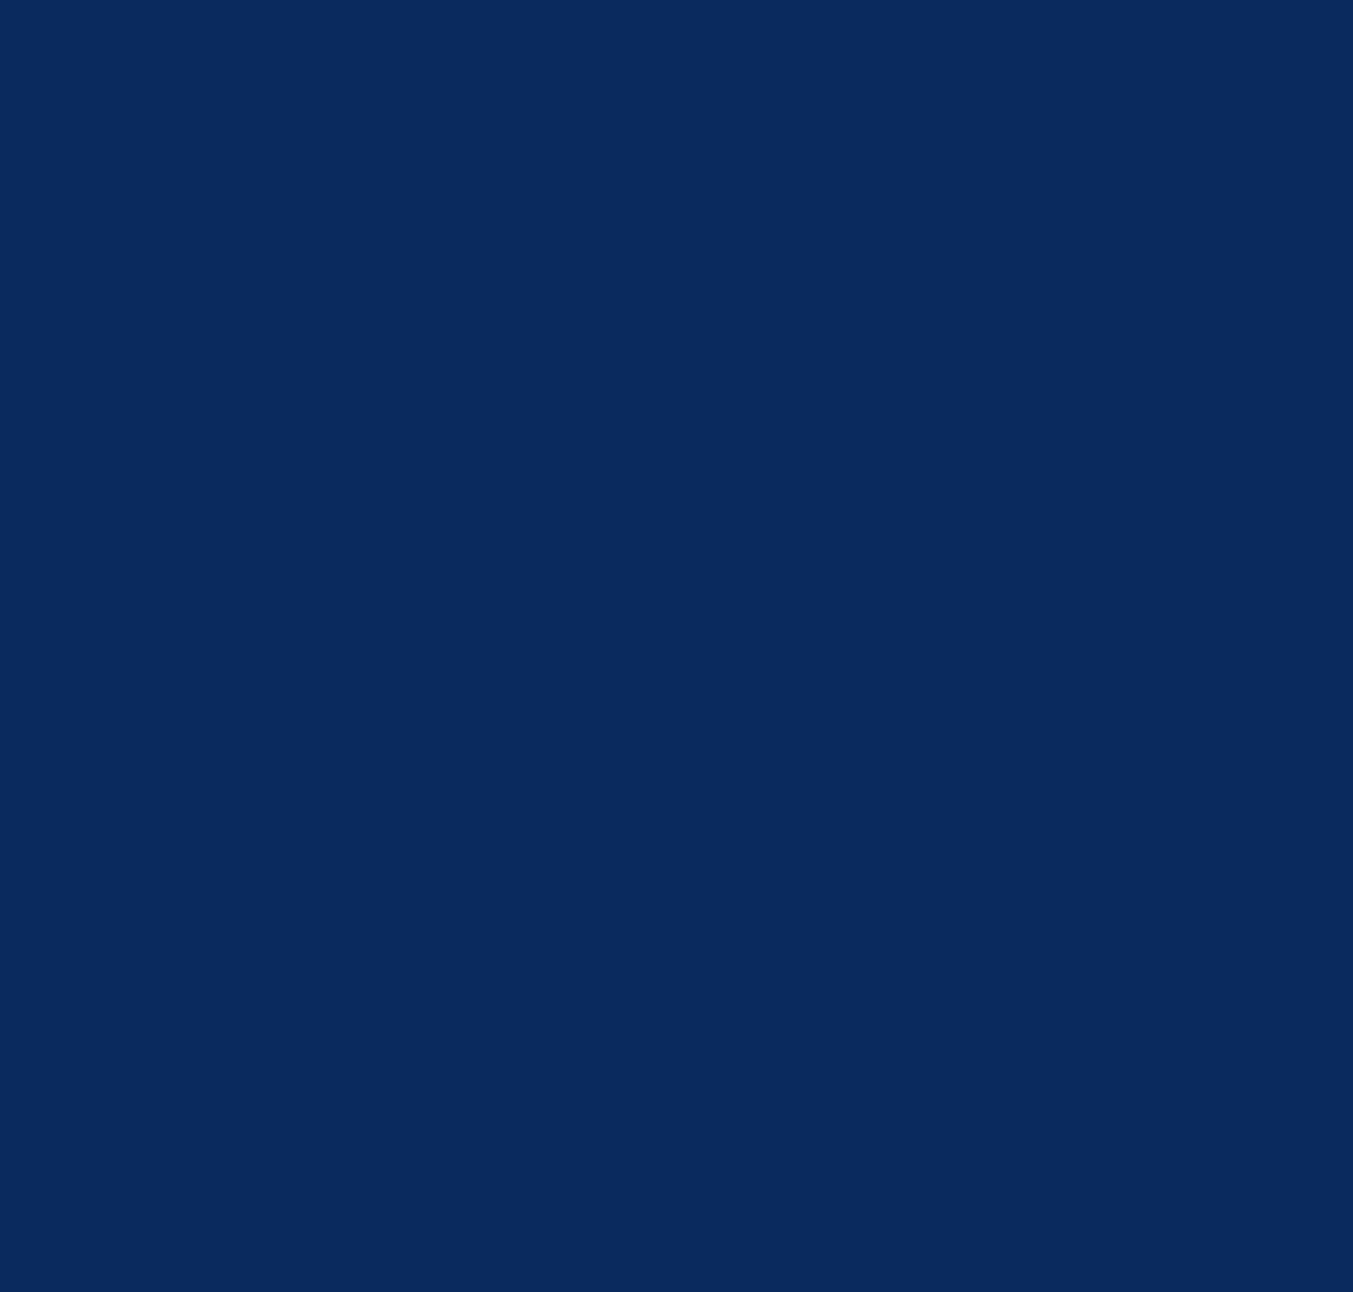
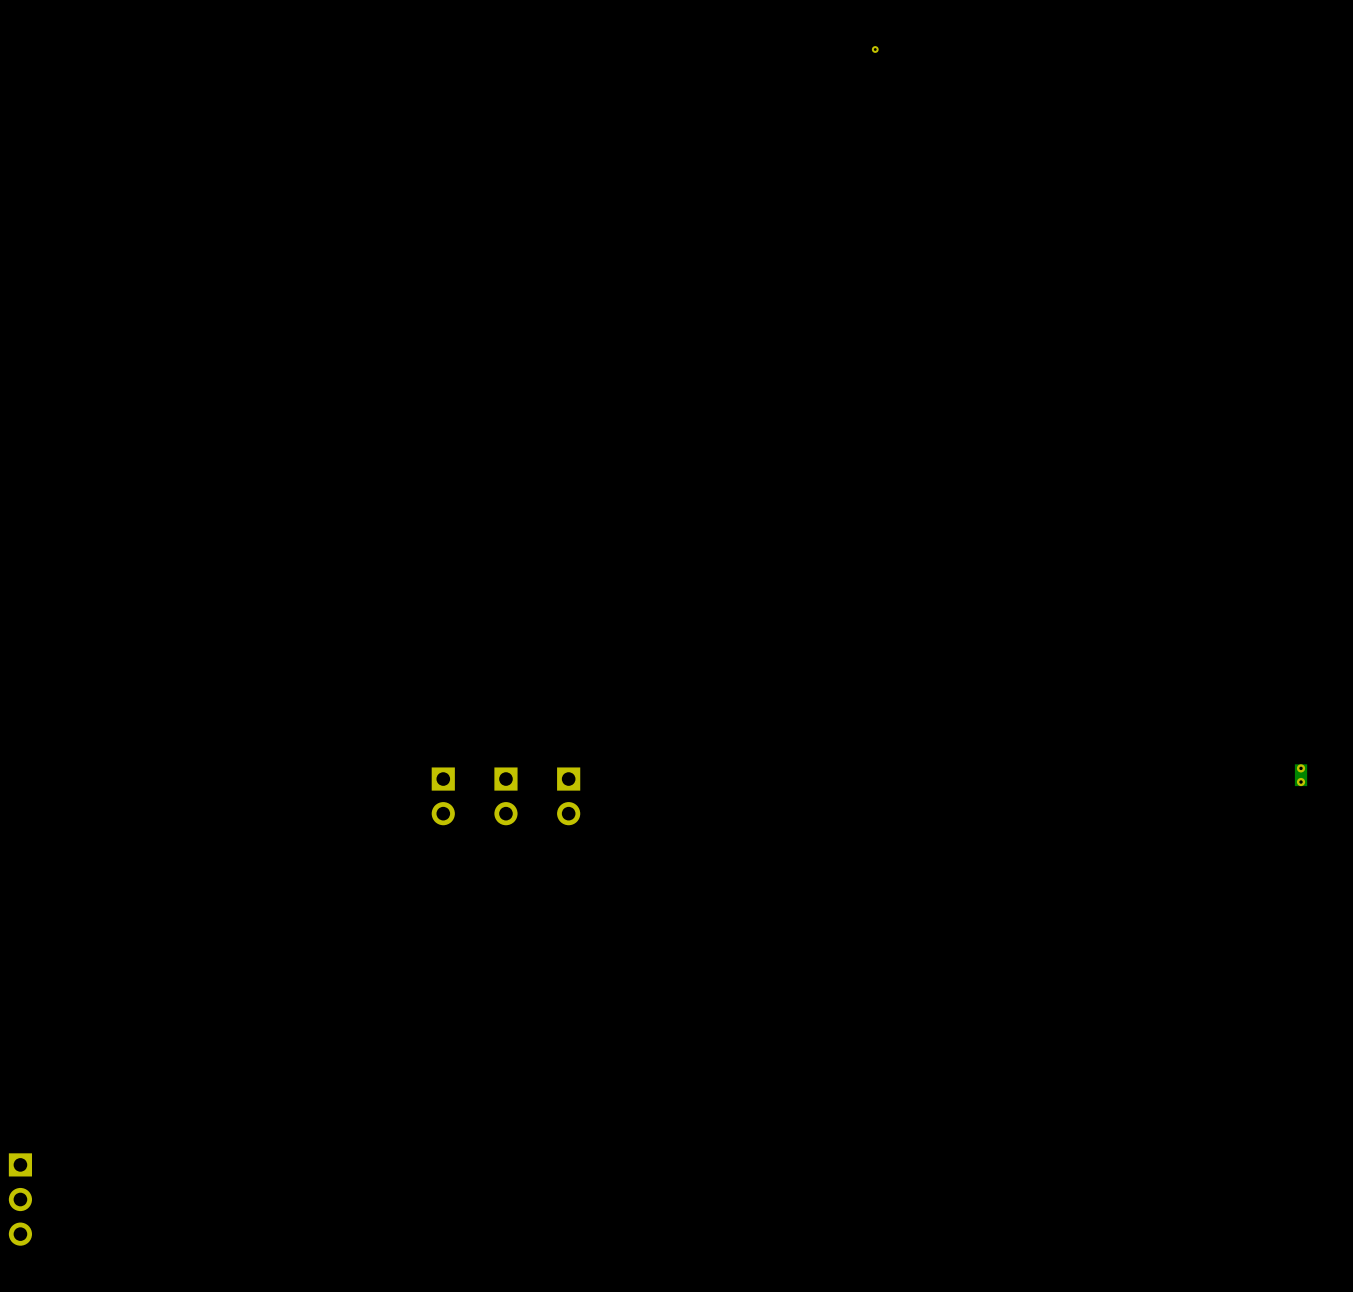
part: none -> (875, 49)
part: none -> (1301, 775)
part: none -> (443, 796)
part: none -> (505, 796)
part: none -> (568, 796)
part: none -> (20, 1199)

